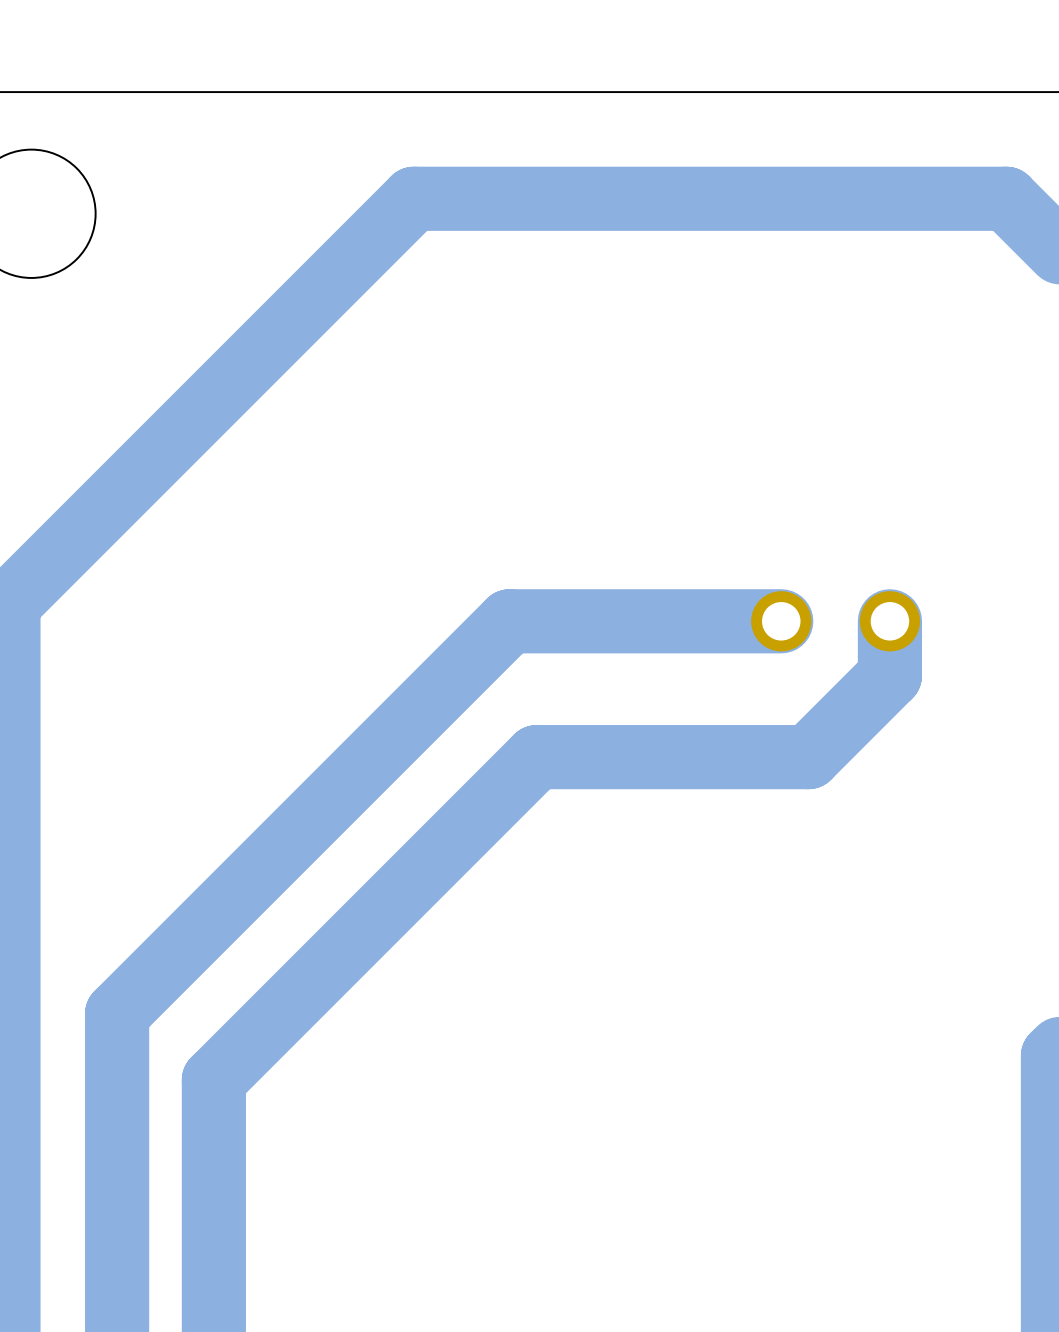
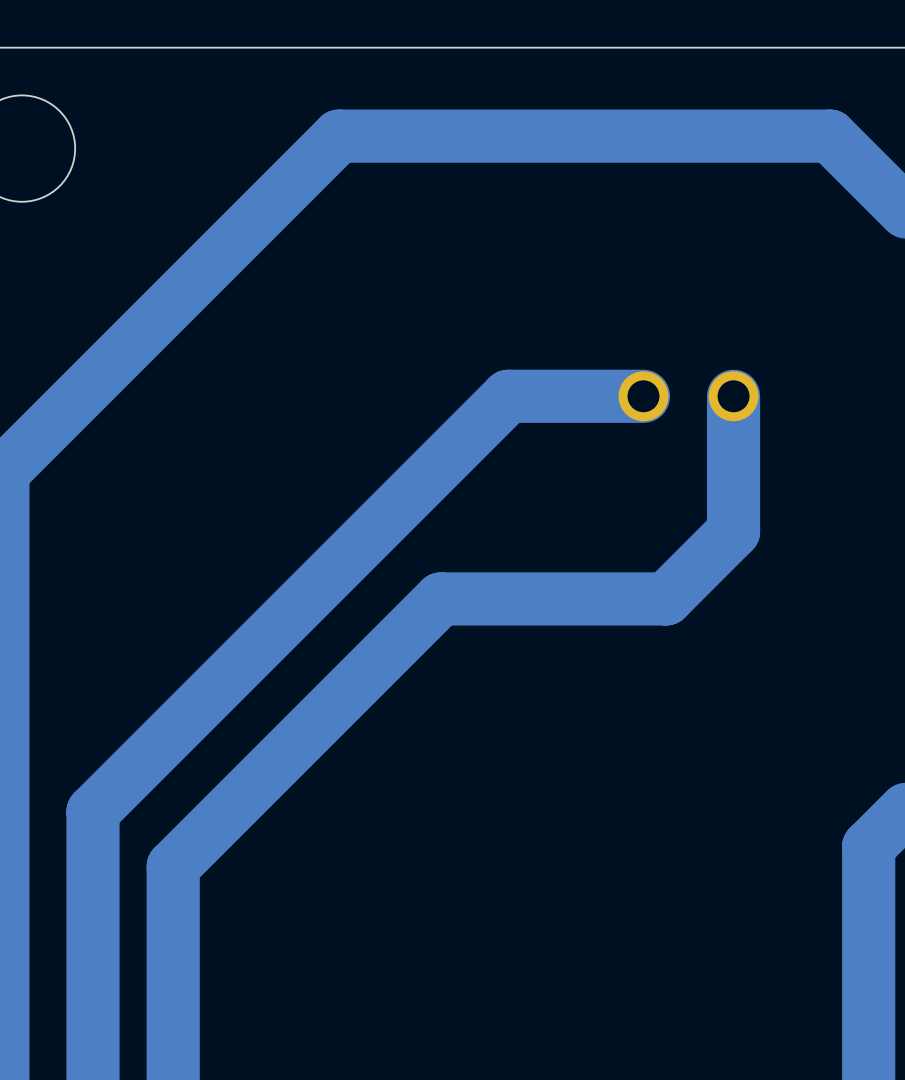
bottom track: none -> (733, 396) (733, 486)
bottom track: (781, 621) (509, 621) -> (643, 396) (508, 396) (418, 486)
part position: (835, 621) -> (688, 396)

